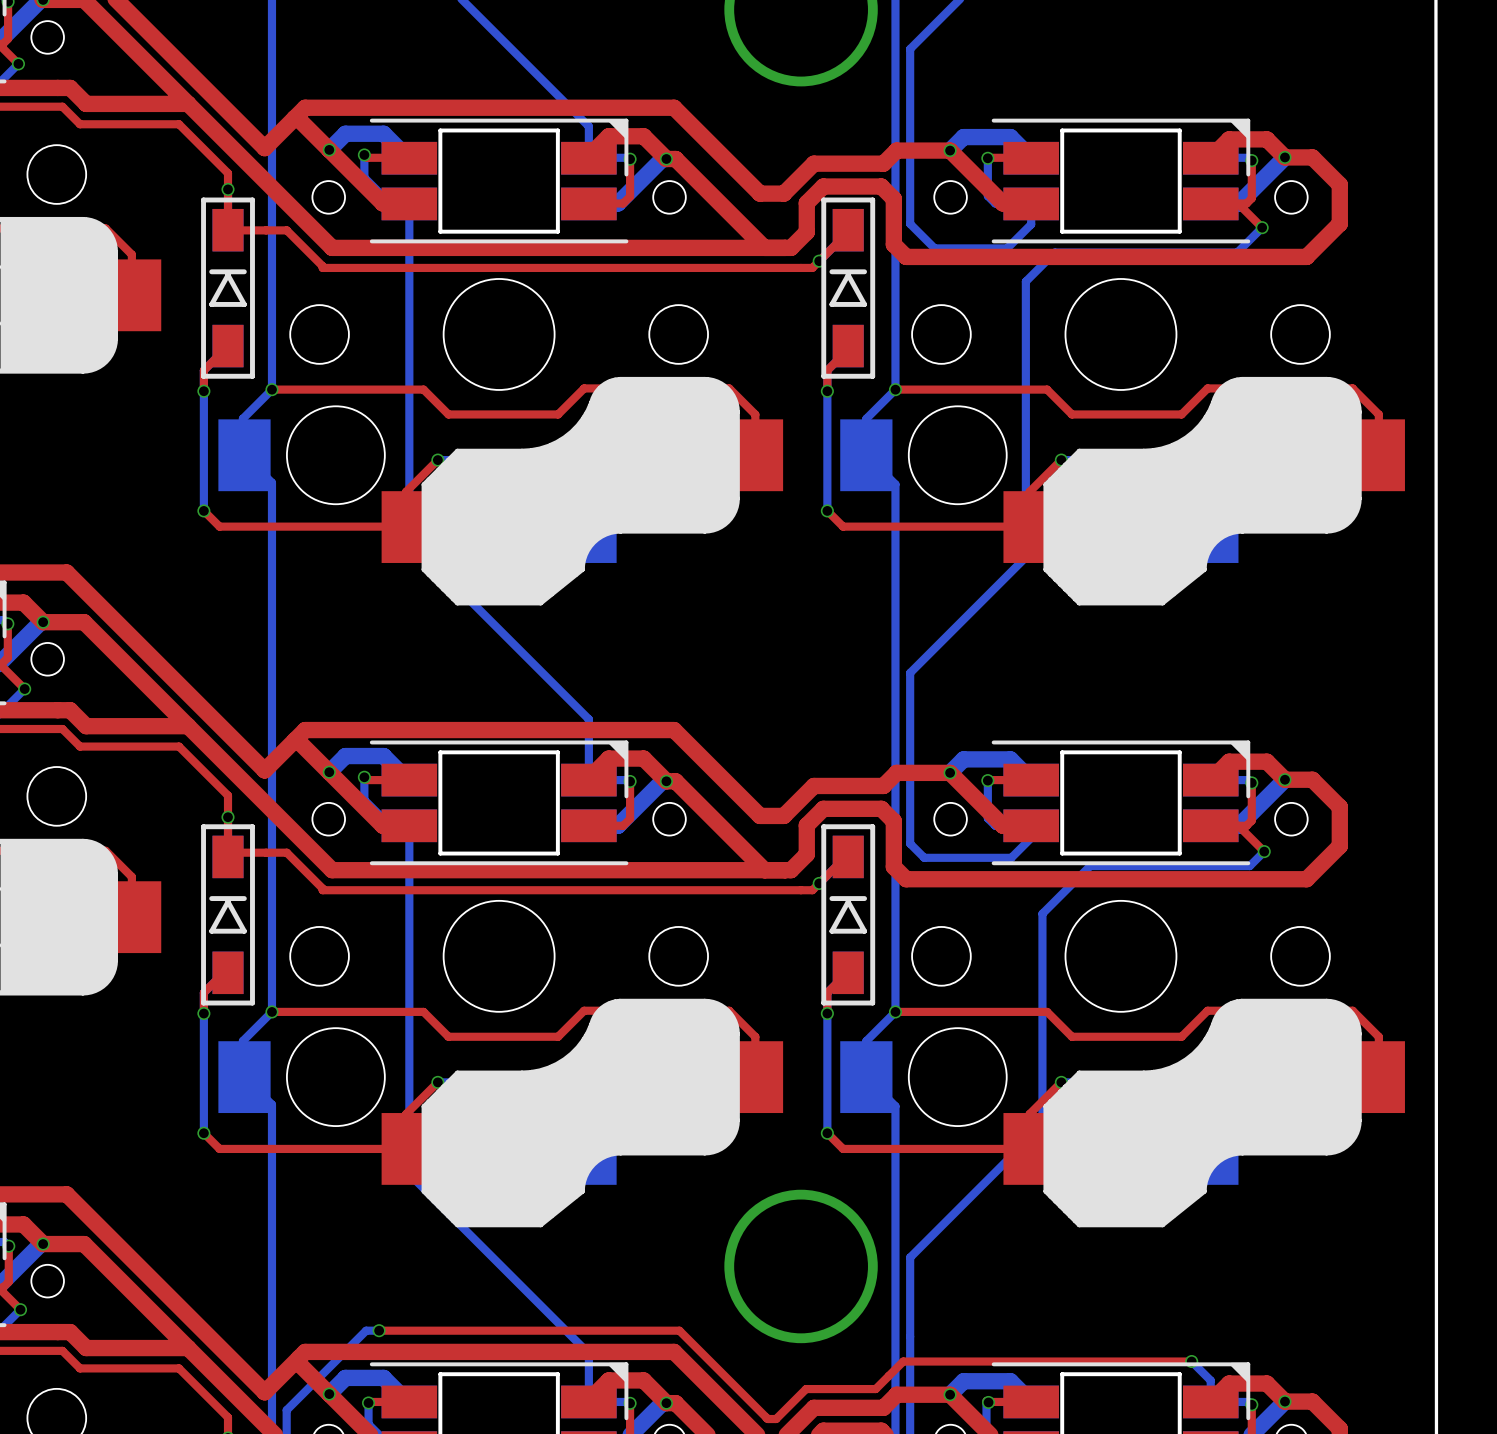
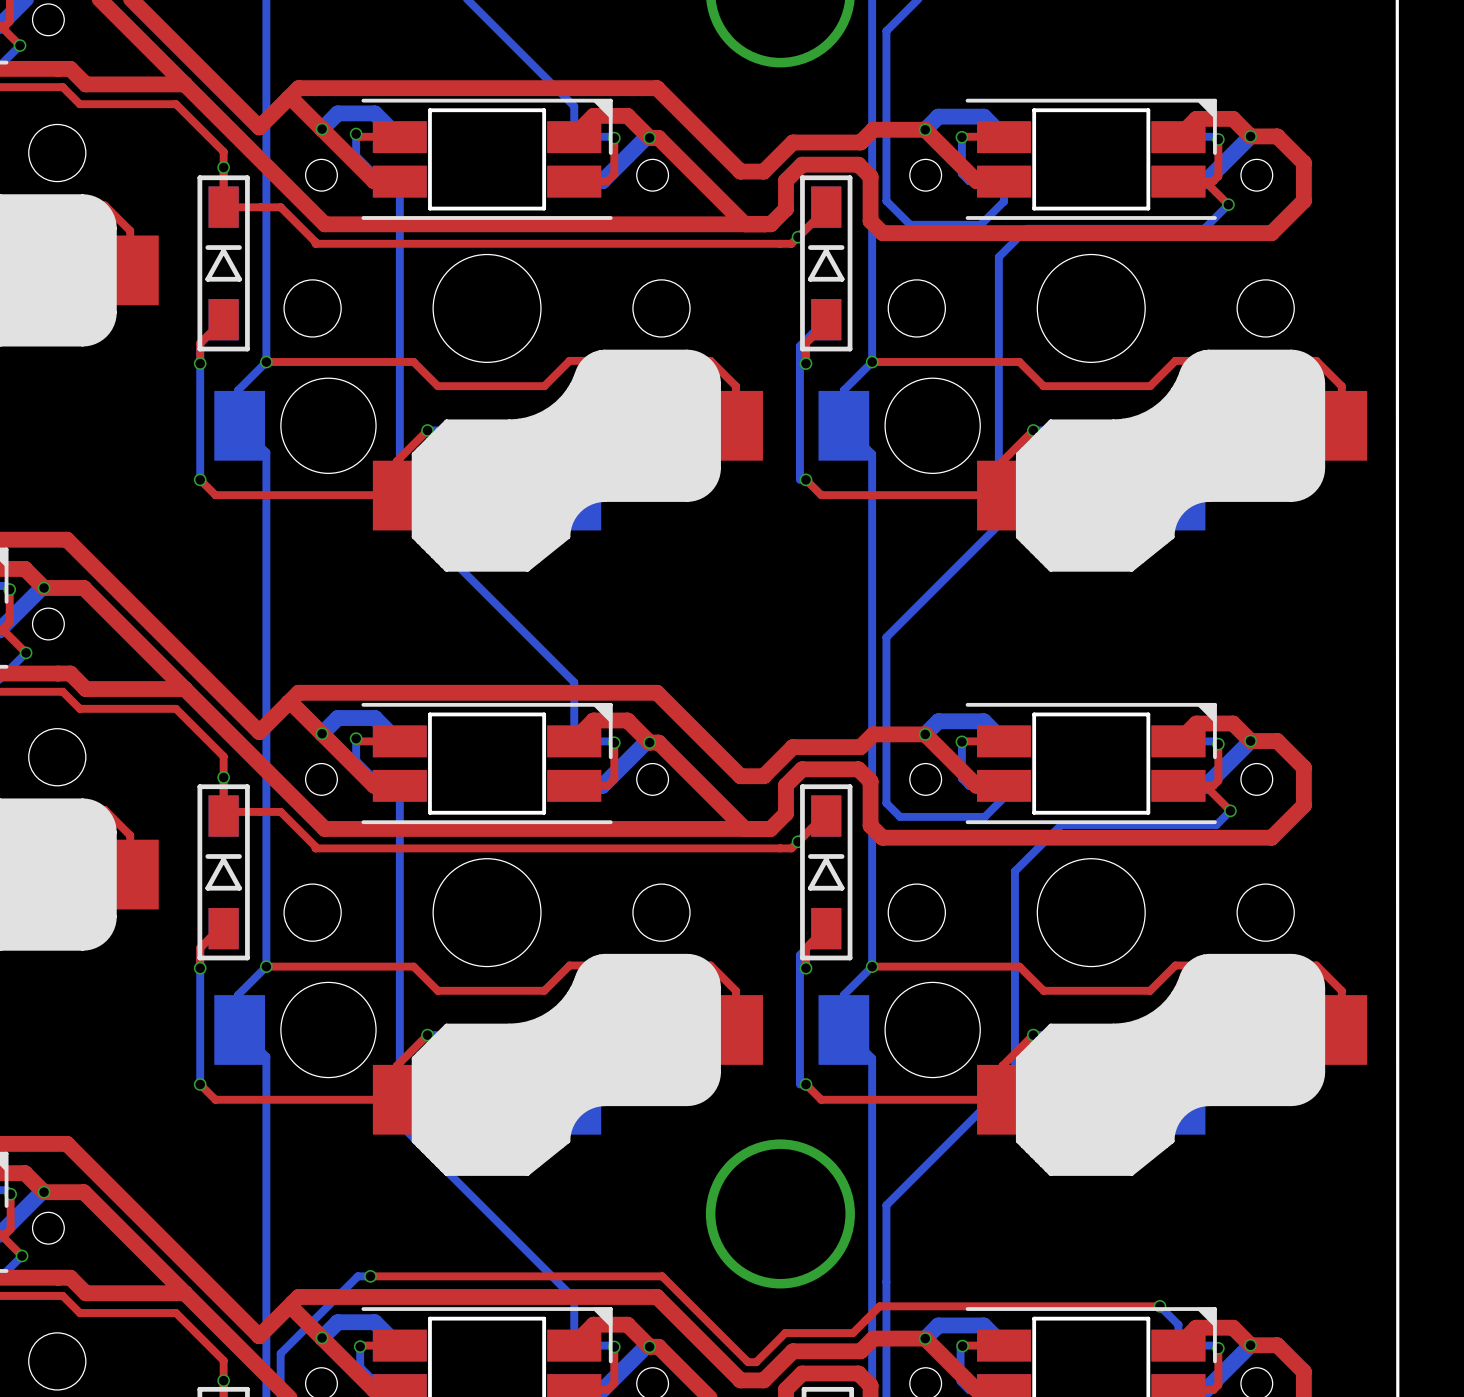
bottom track: none -> (826, 319) (799, 346) (799, 479)
bottom track: (851, 346) (827, 370) (827, 510) -> none
bottom track: (851, 968) (827, 992) (827, 1133) -> none
bottom track: none -> (826, 928) (799, 954) (799, 1084)

